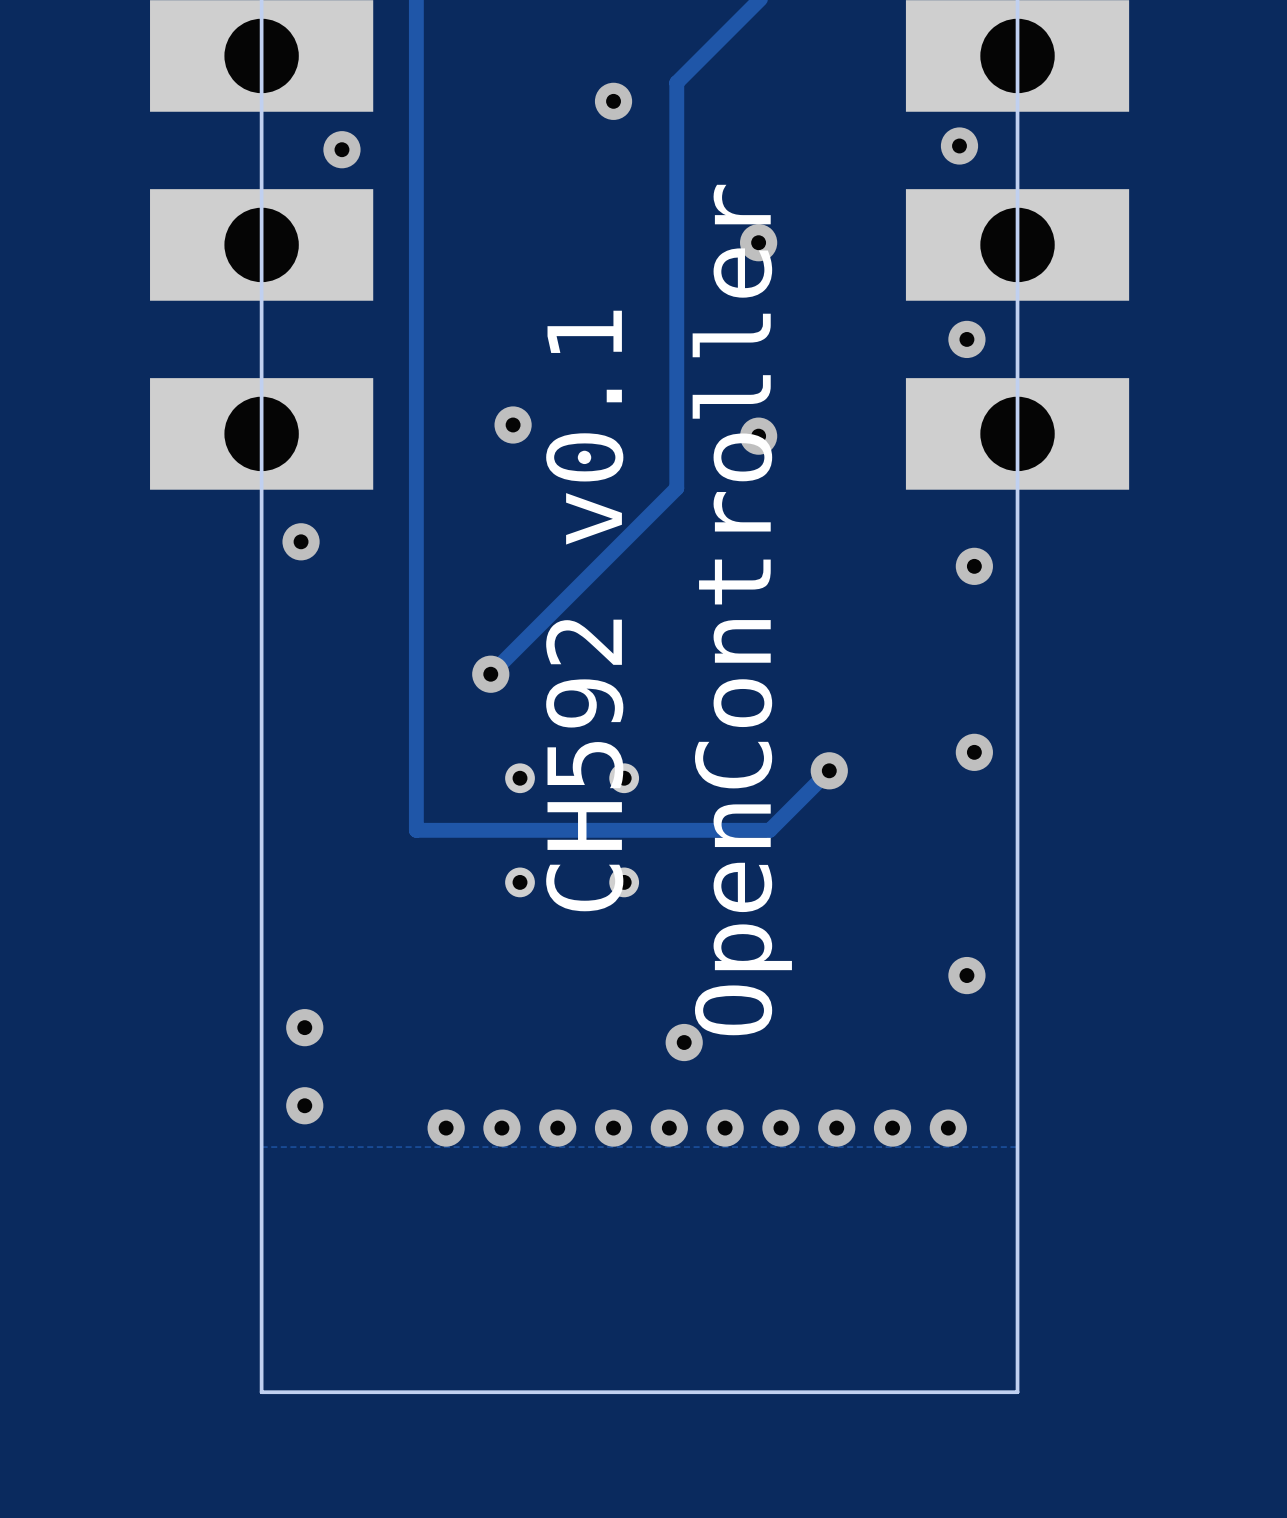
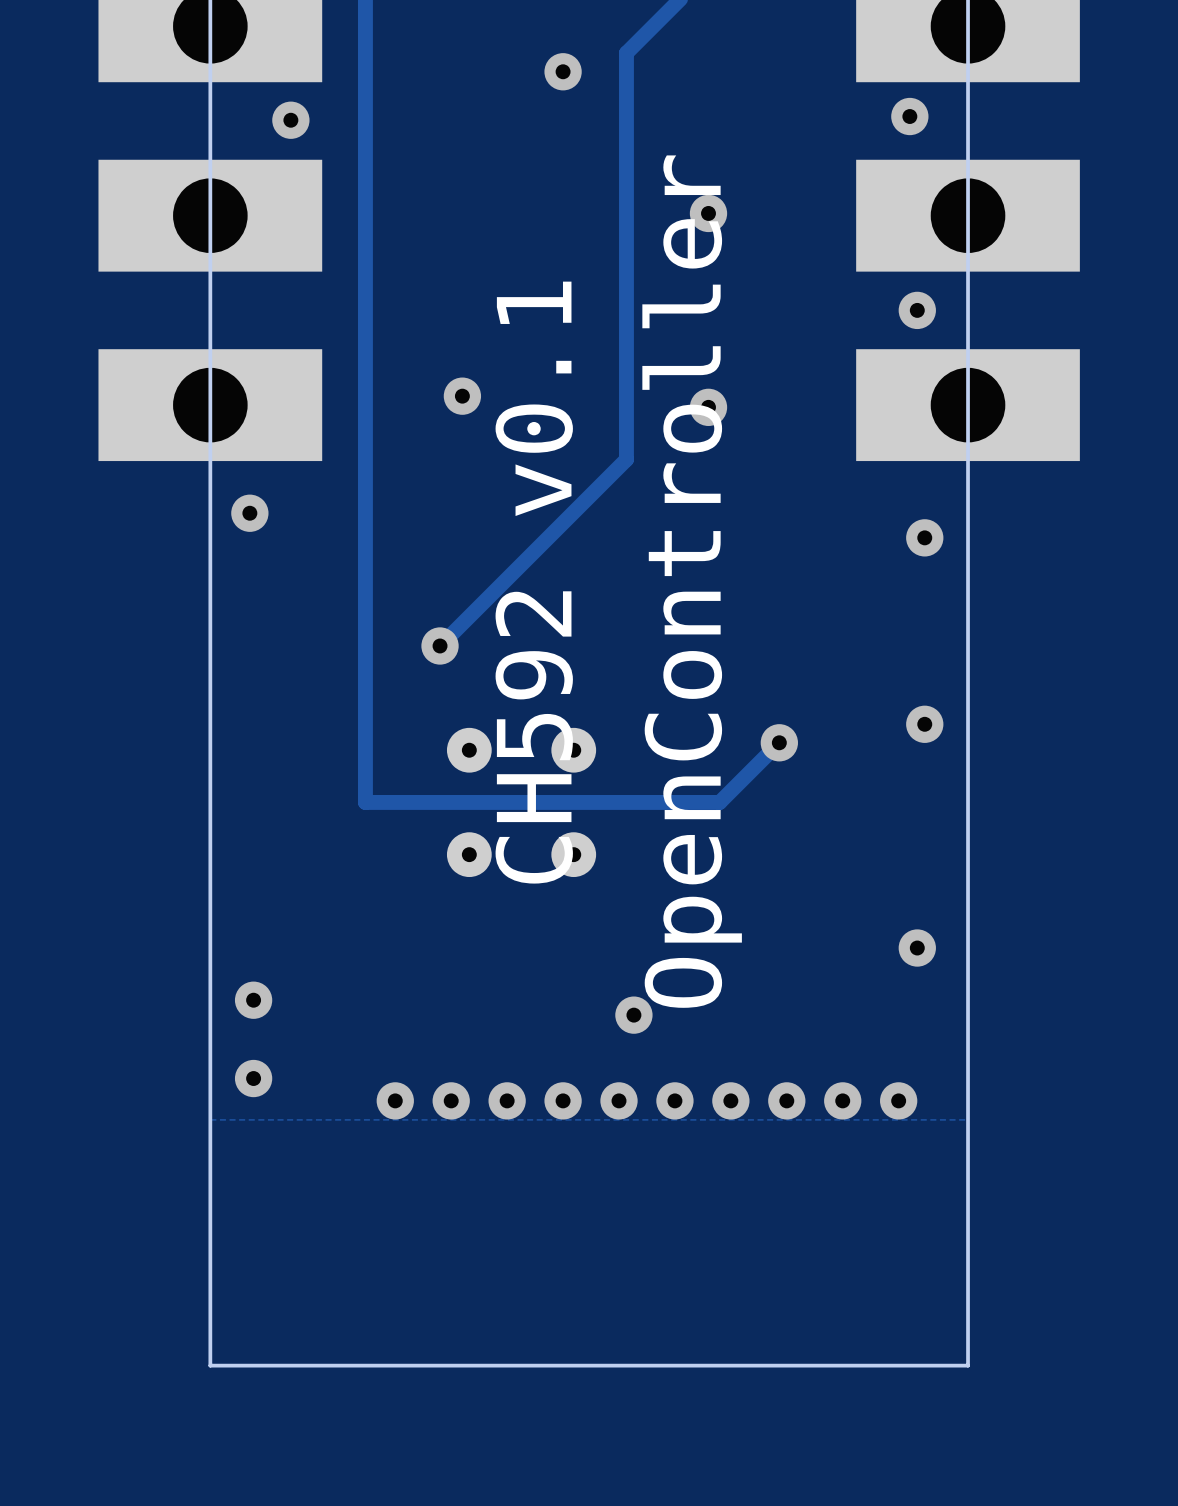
part footprint: [505, 763, 640, 898] -> [446, 727, 597, 878]

